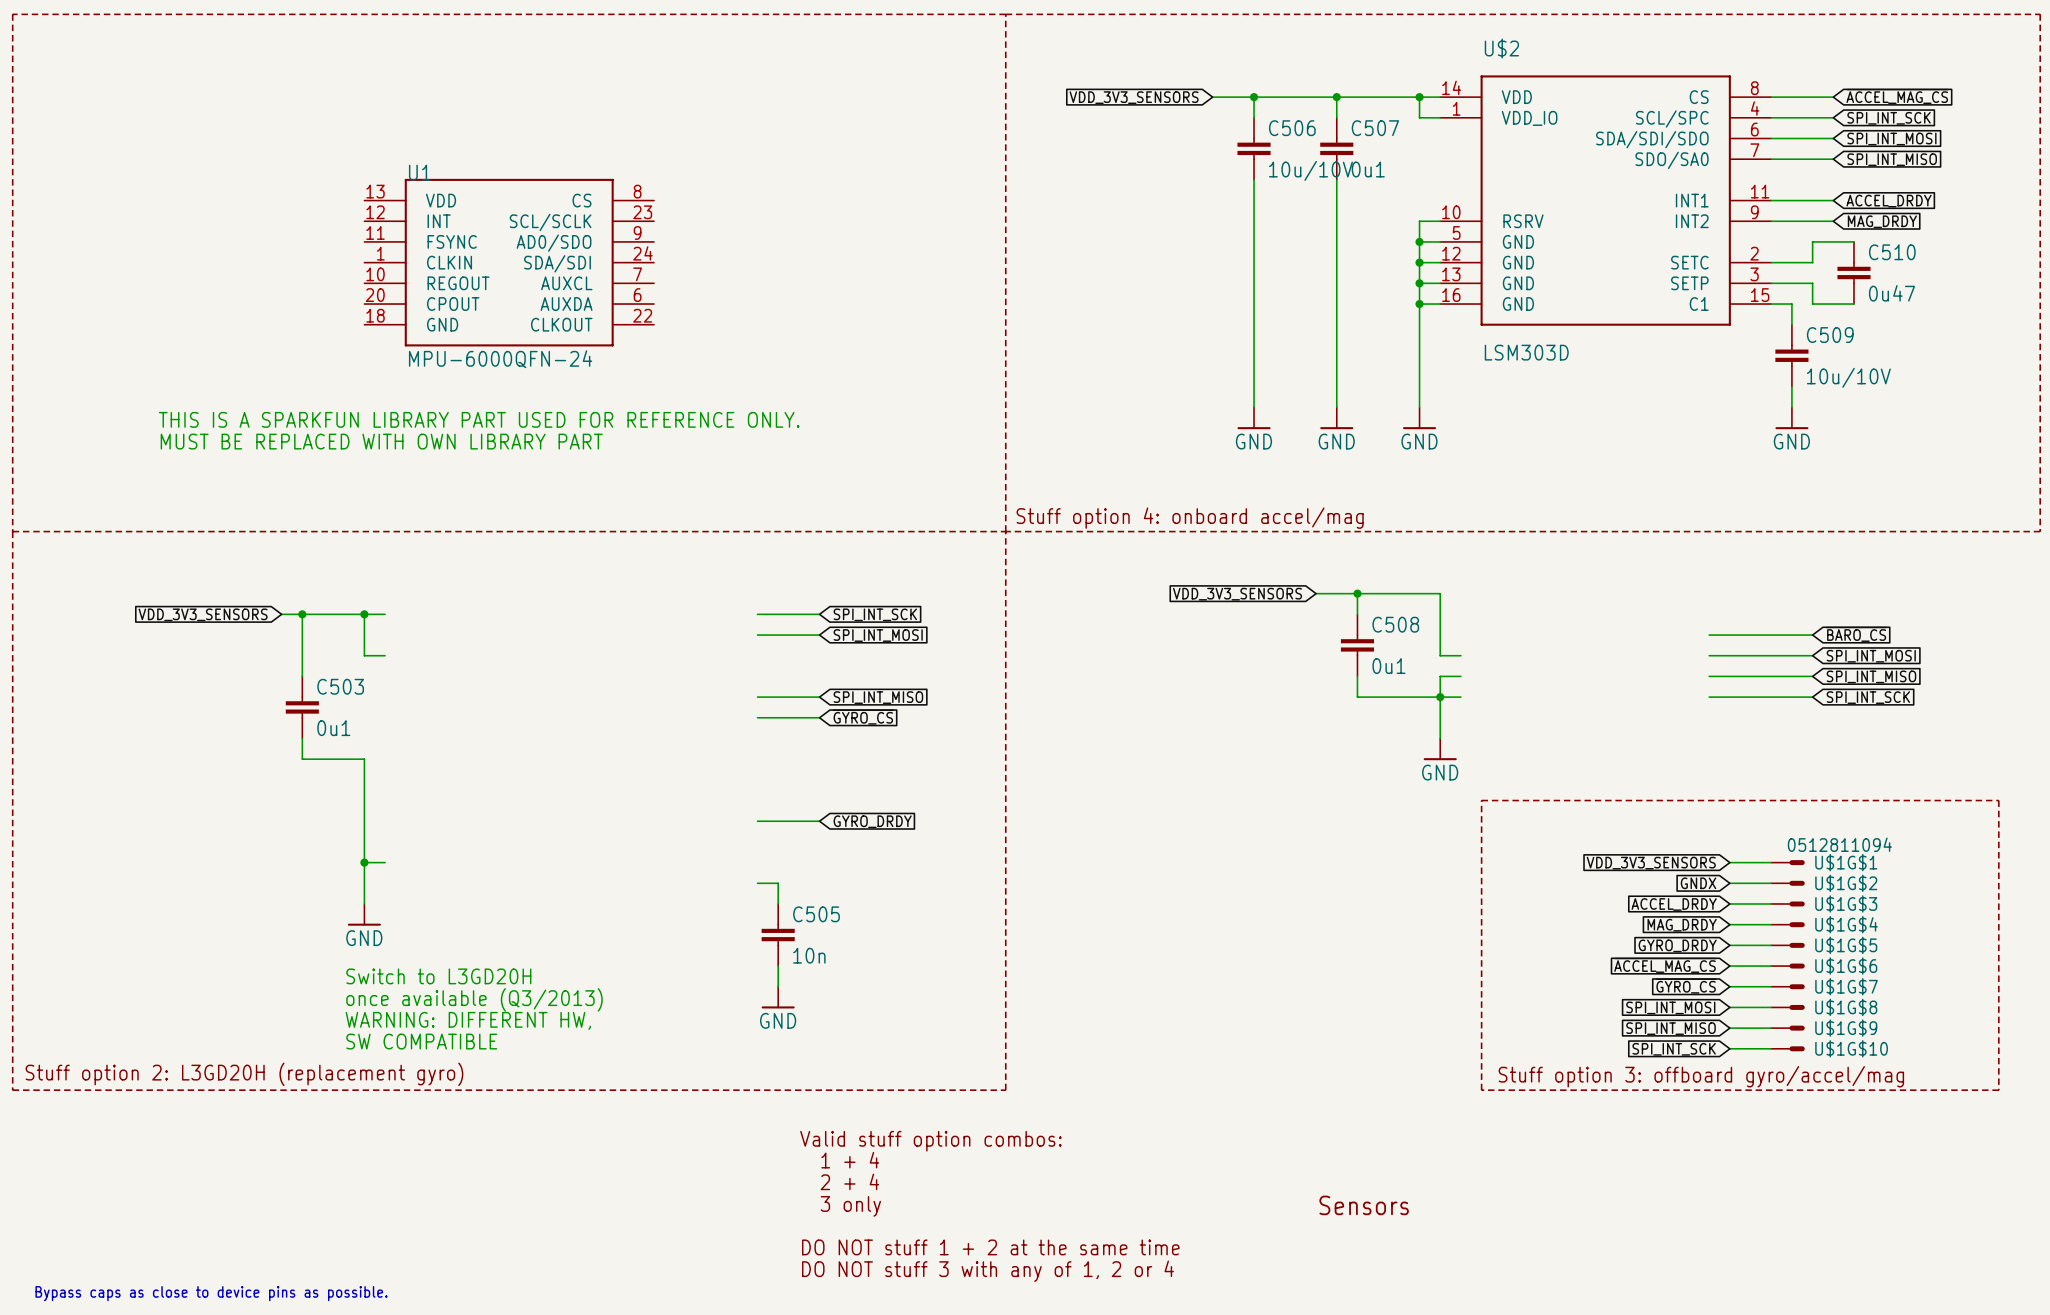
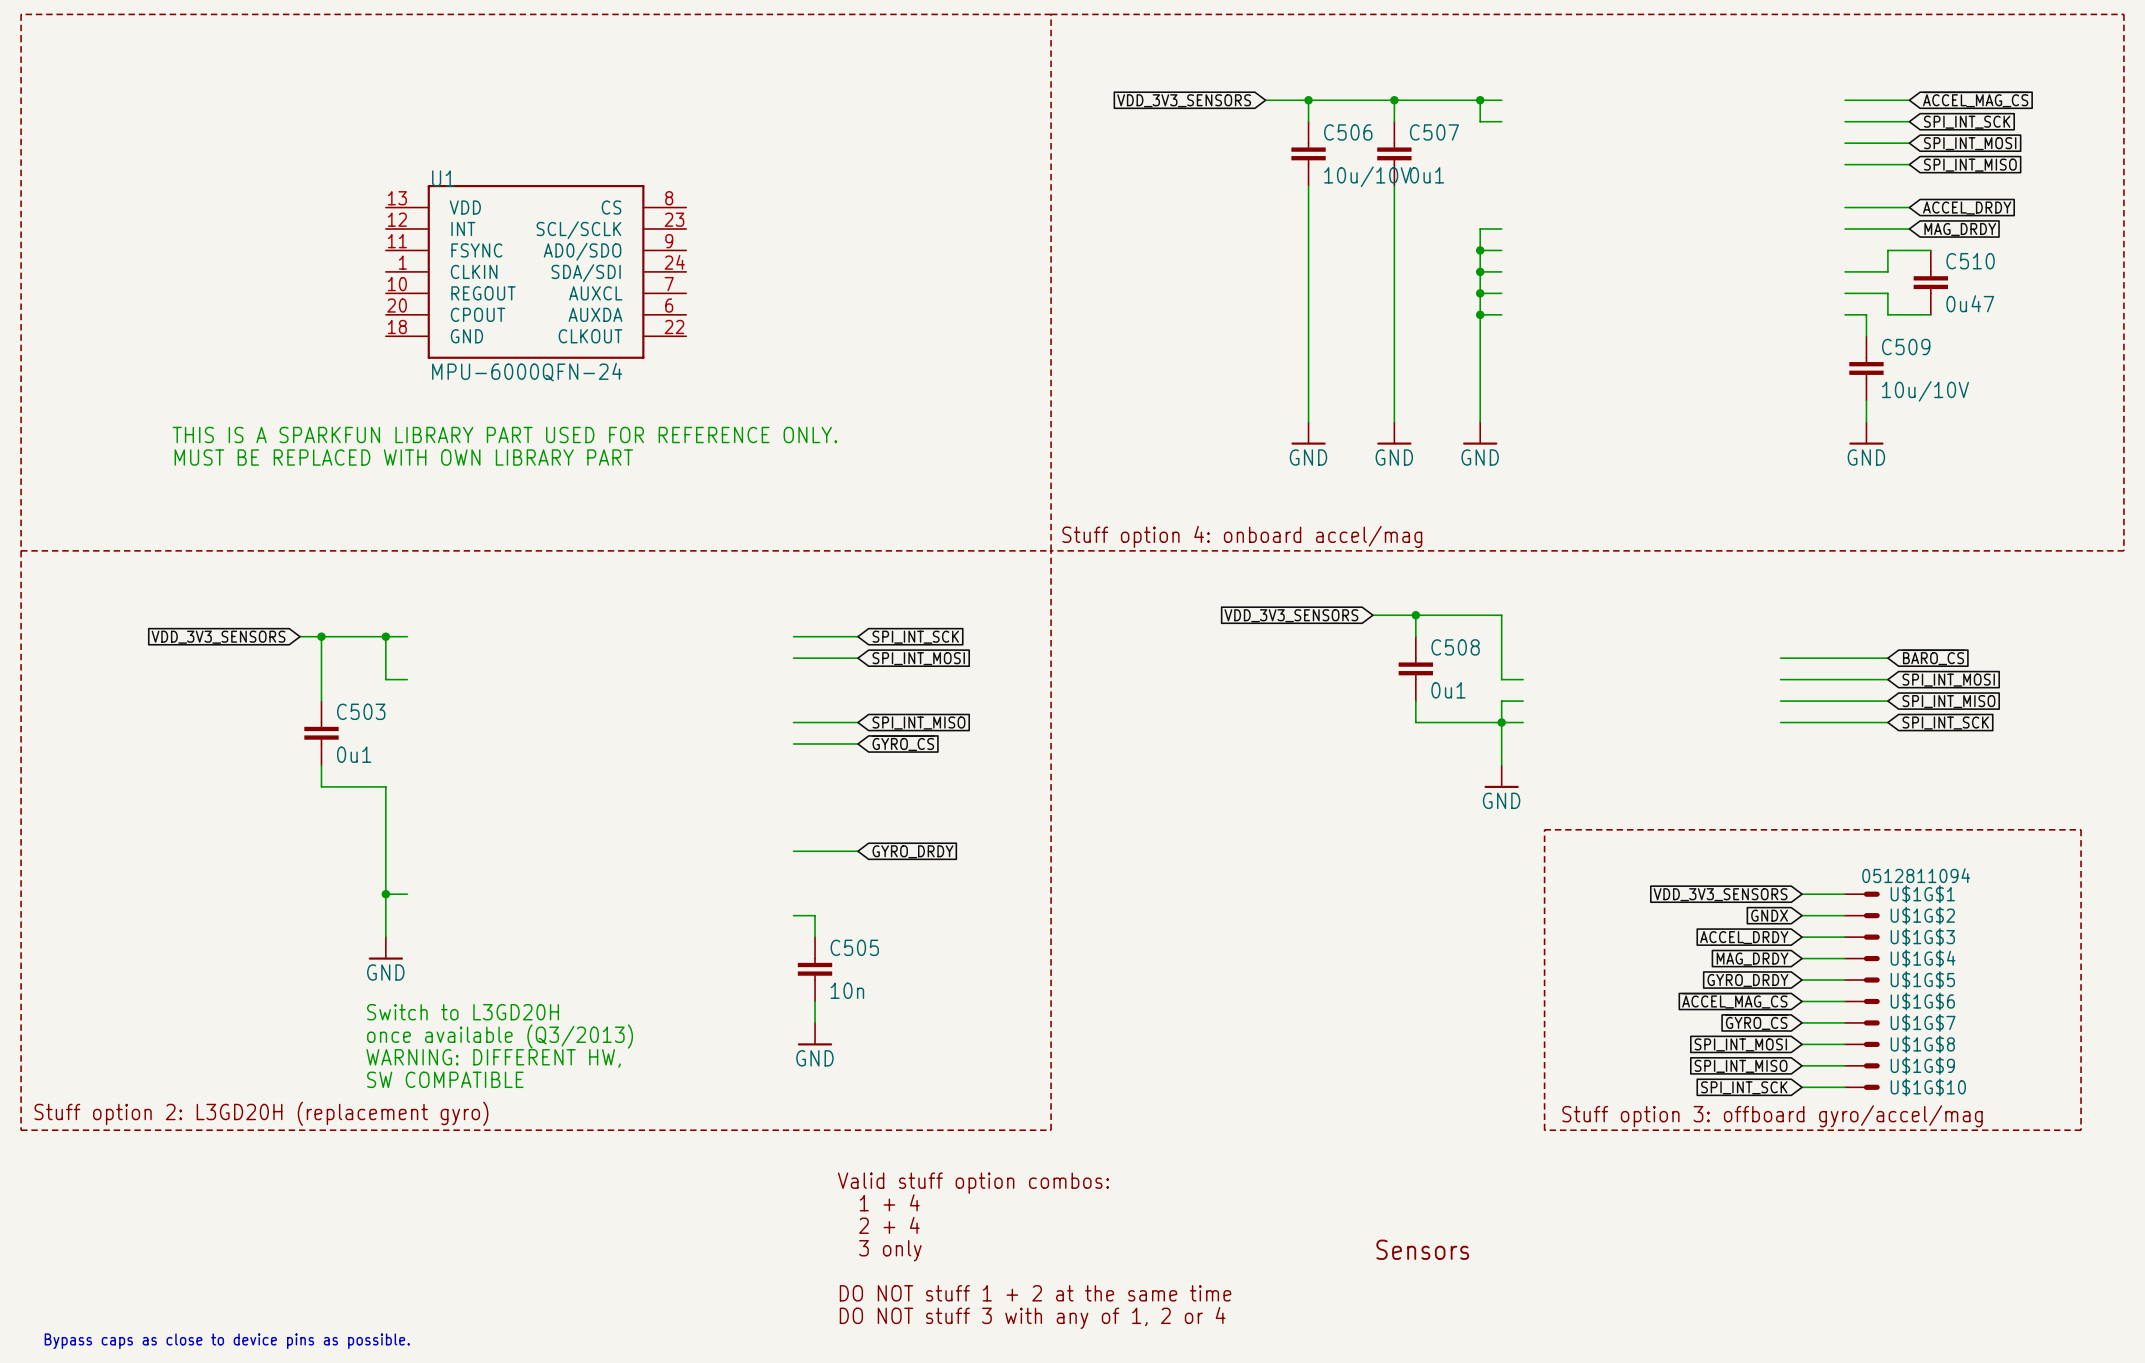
U$2: LSM303D (1605, 200) -> none

